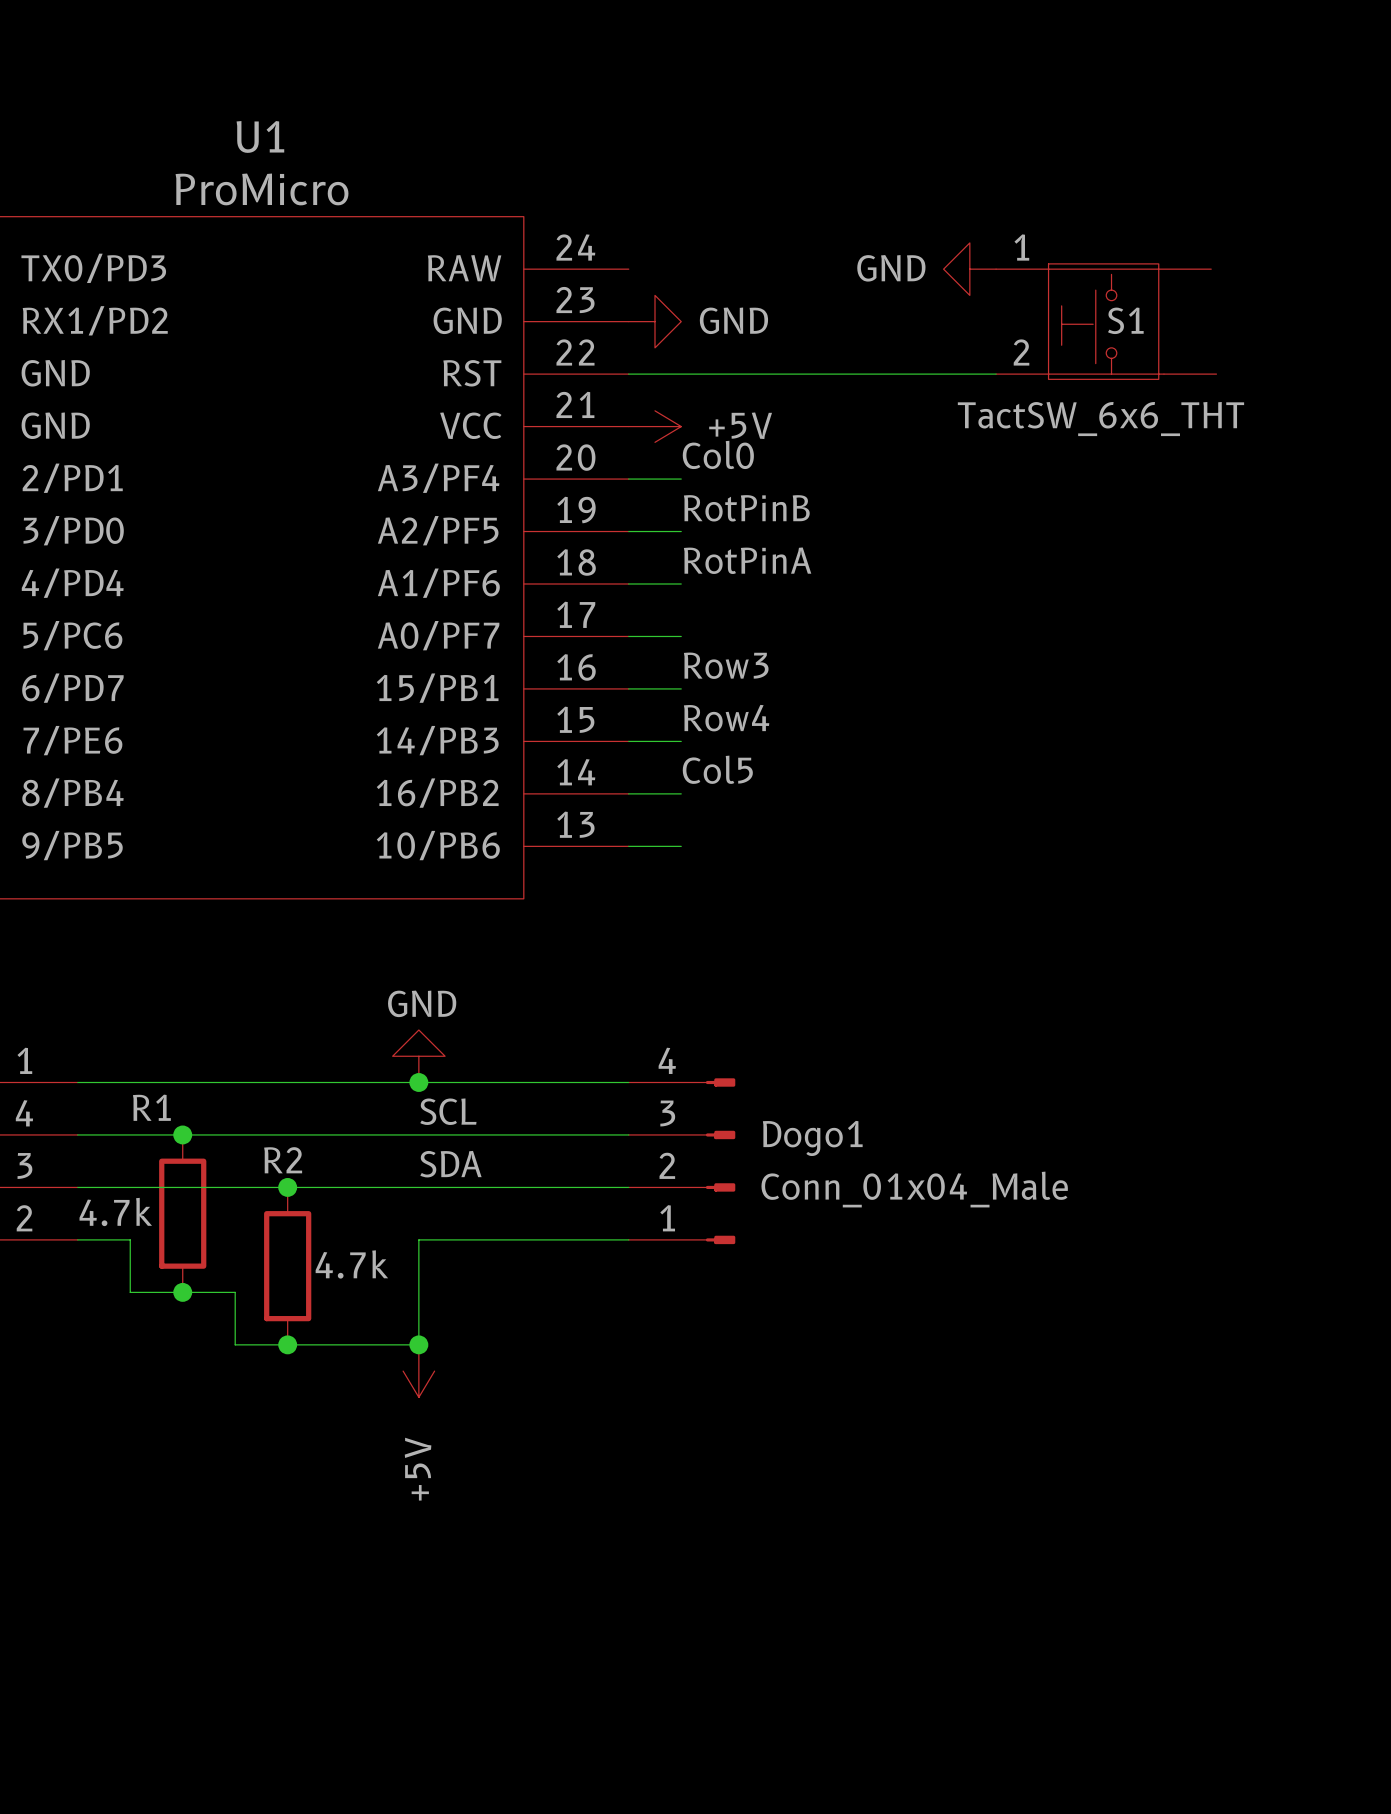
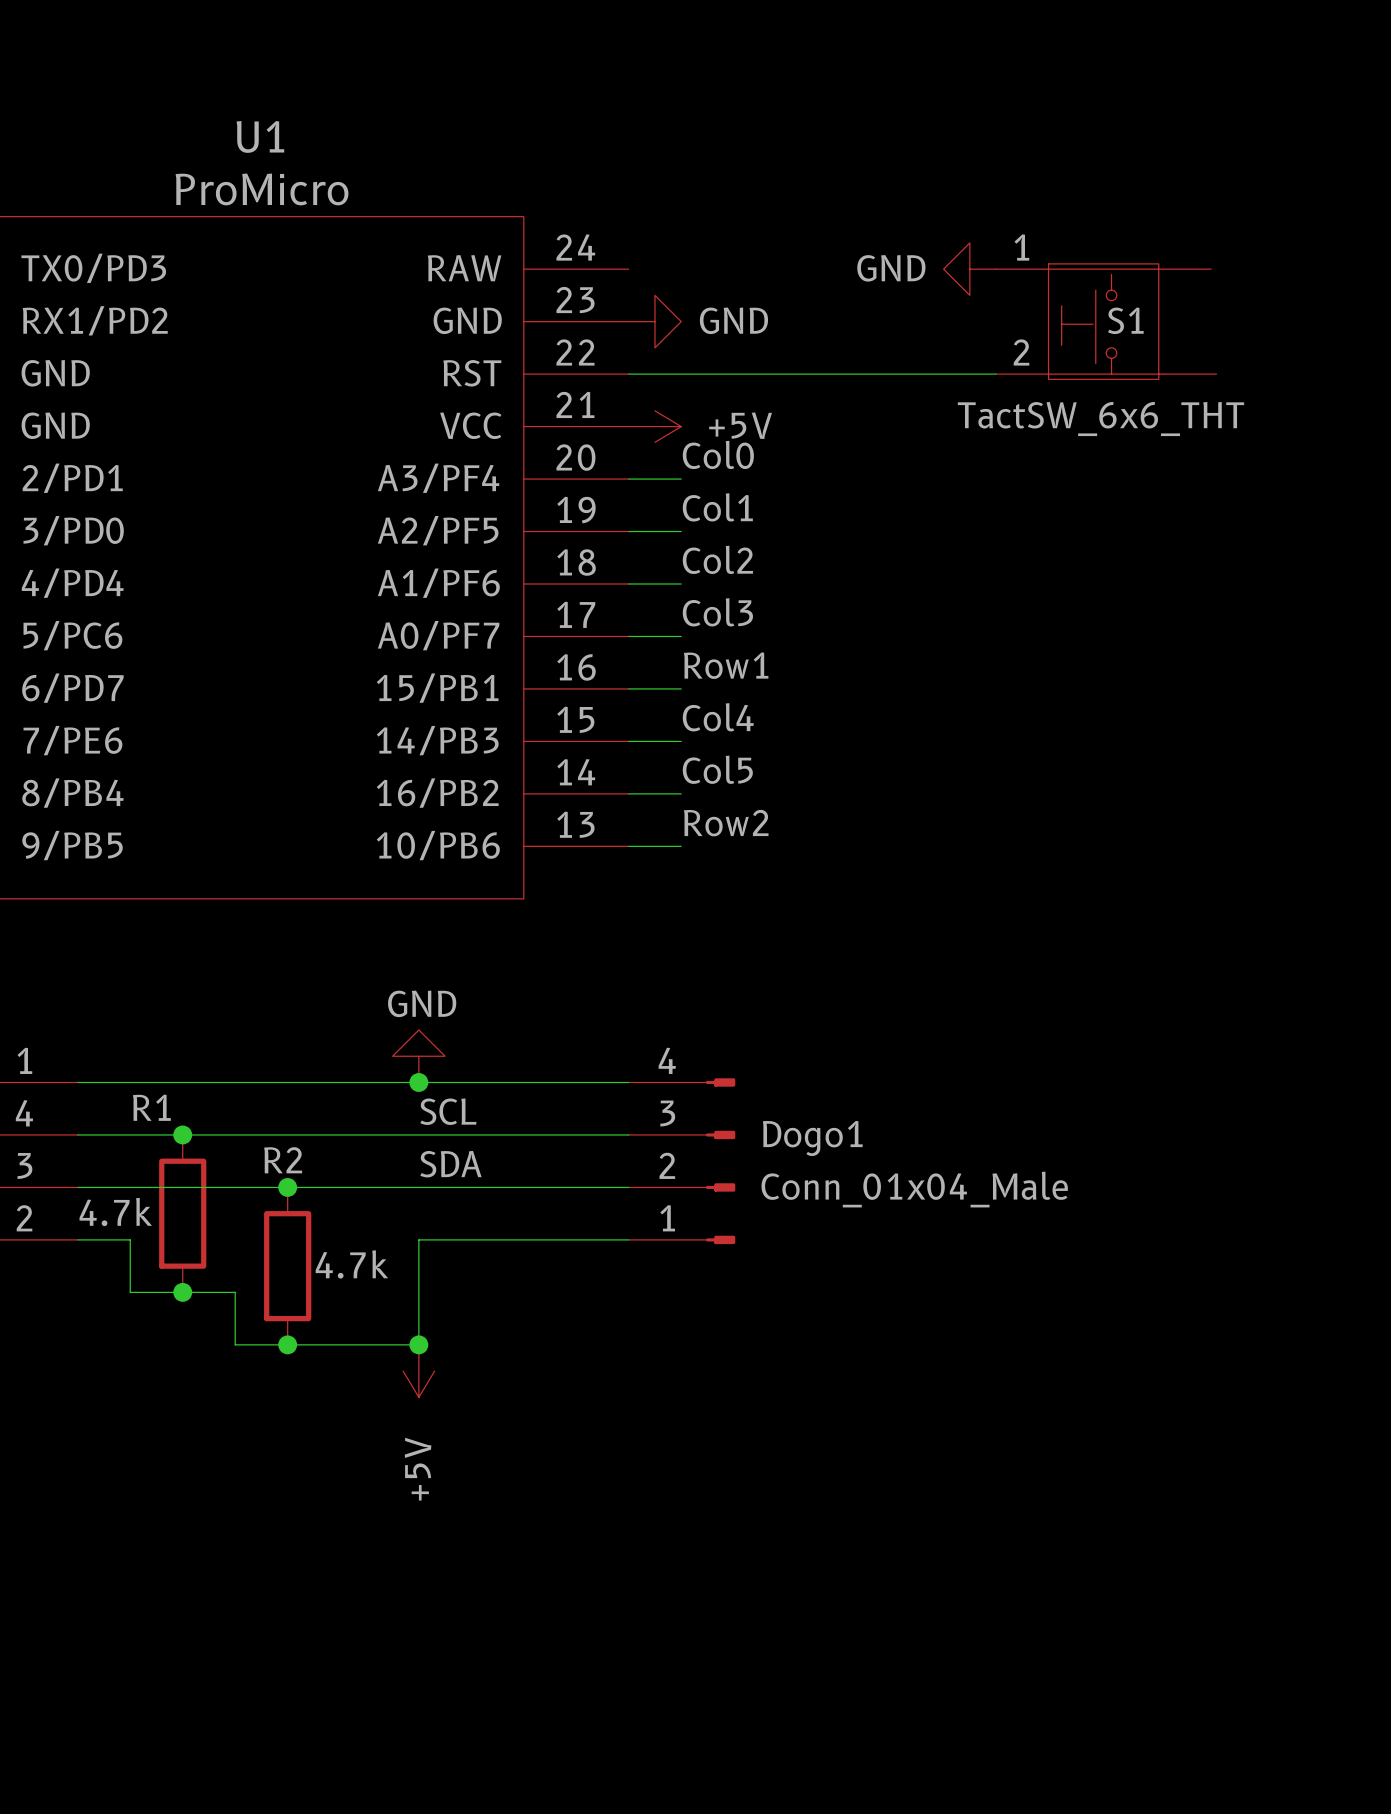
label: RotPinB (746, 508) -> Col1 (717, 507)
label: RotPinA (747, 560) -> Col2 (717, 559)
label: none -> Col3 (717, 612)
label: Row3 (726, 665) -> Row1 (726, 665)
label: Row4 (726, 718) -> Col4 (718, 717)
label: none -> Row2 (726, 823)

